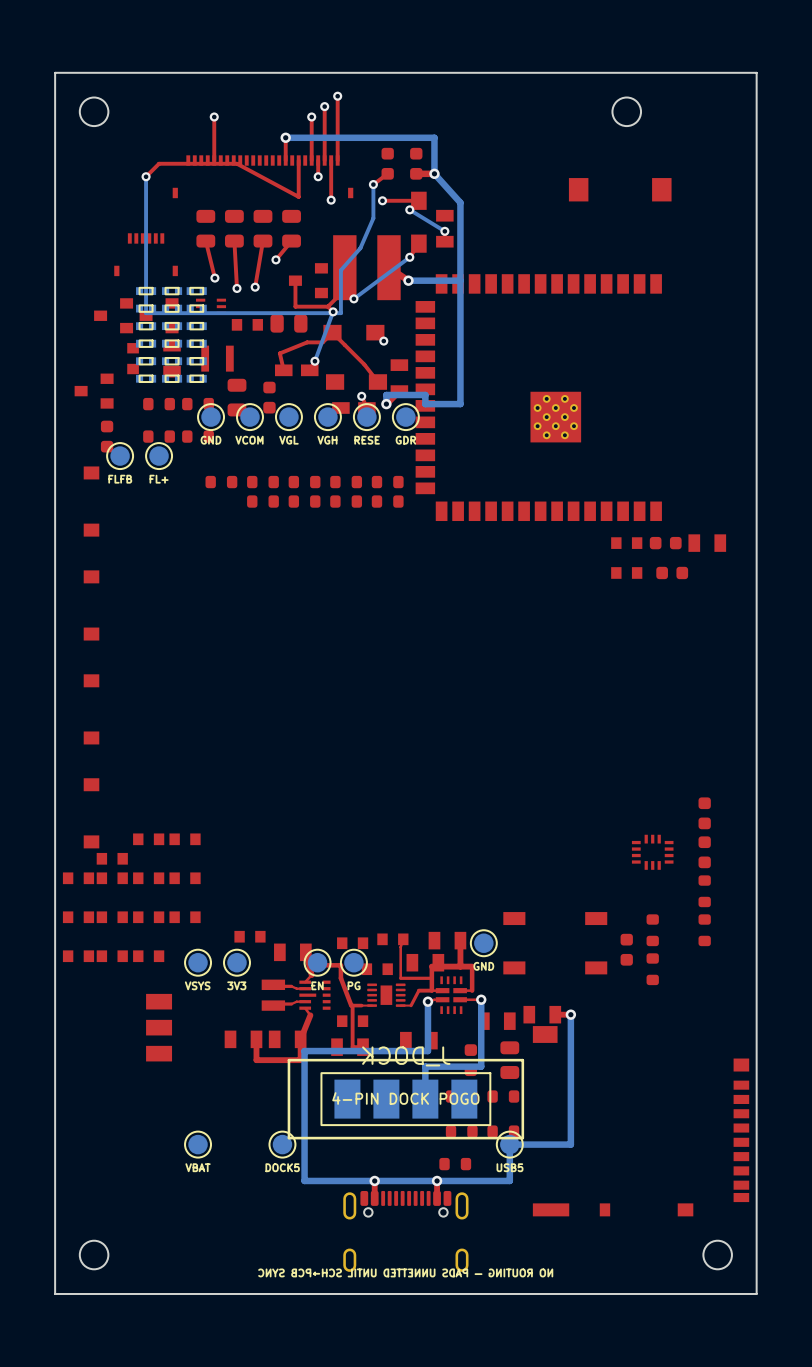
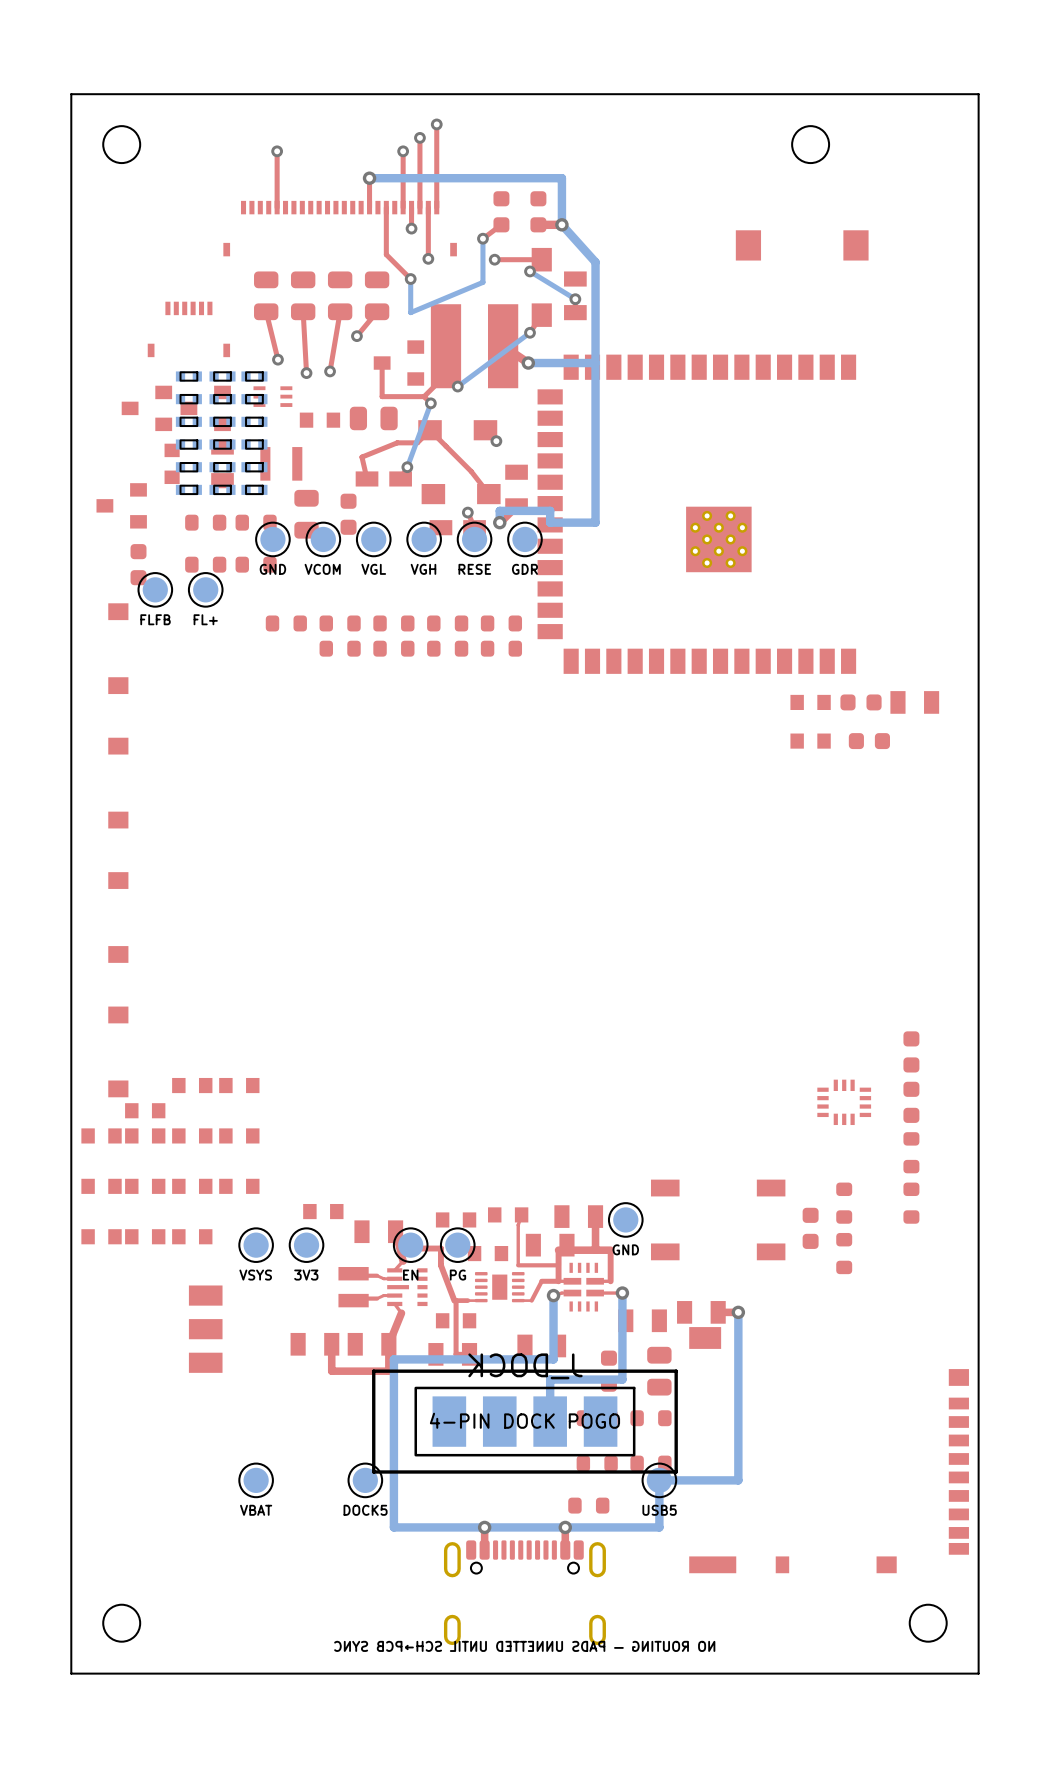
top track: (146, 176) (159, 163) (237, 163) (298, 196) -> (410, 279) (386, 254)
bottom track: (146, 176) (146, 313) (340, 313) (340, 270) (360, 248) (373, 218) -> (410, 279) (410, 312) (482, 282)
via: (146, 176) -> none
via: none -> (410, 279)

